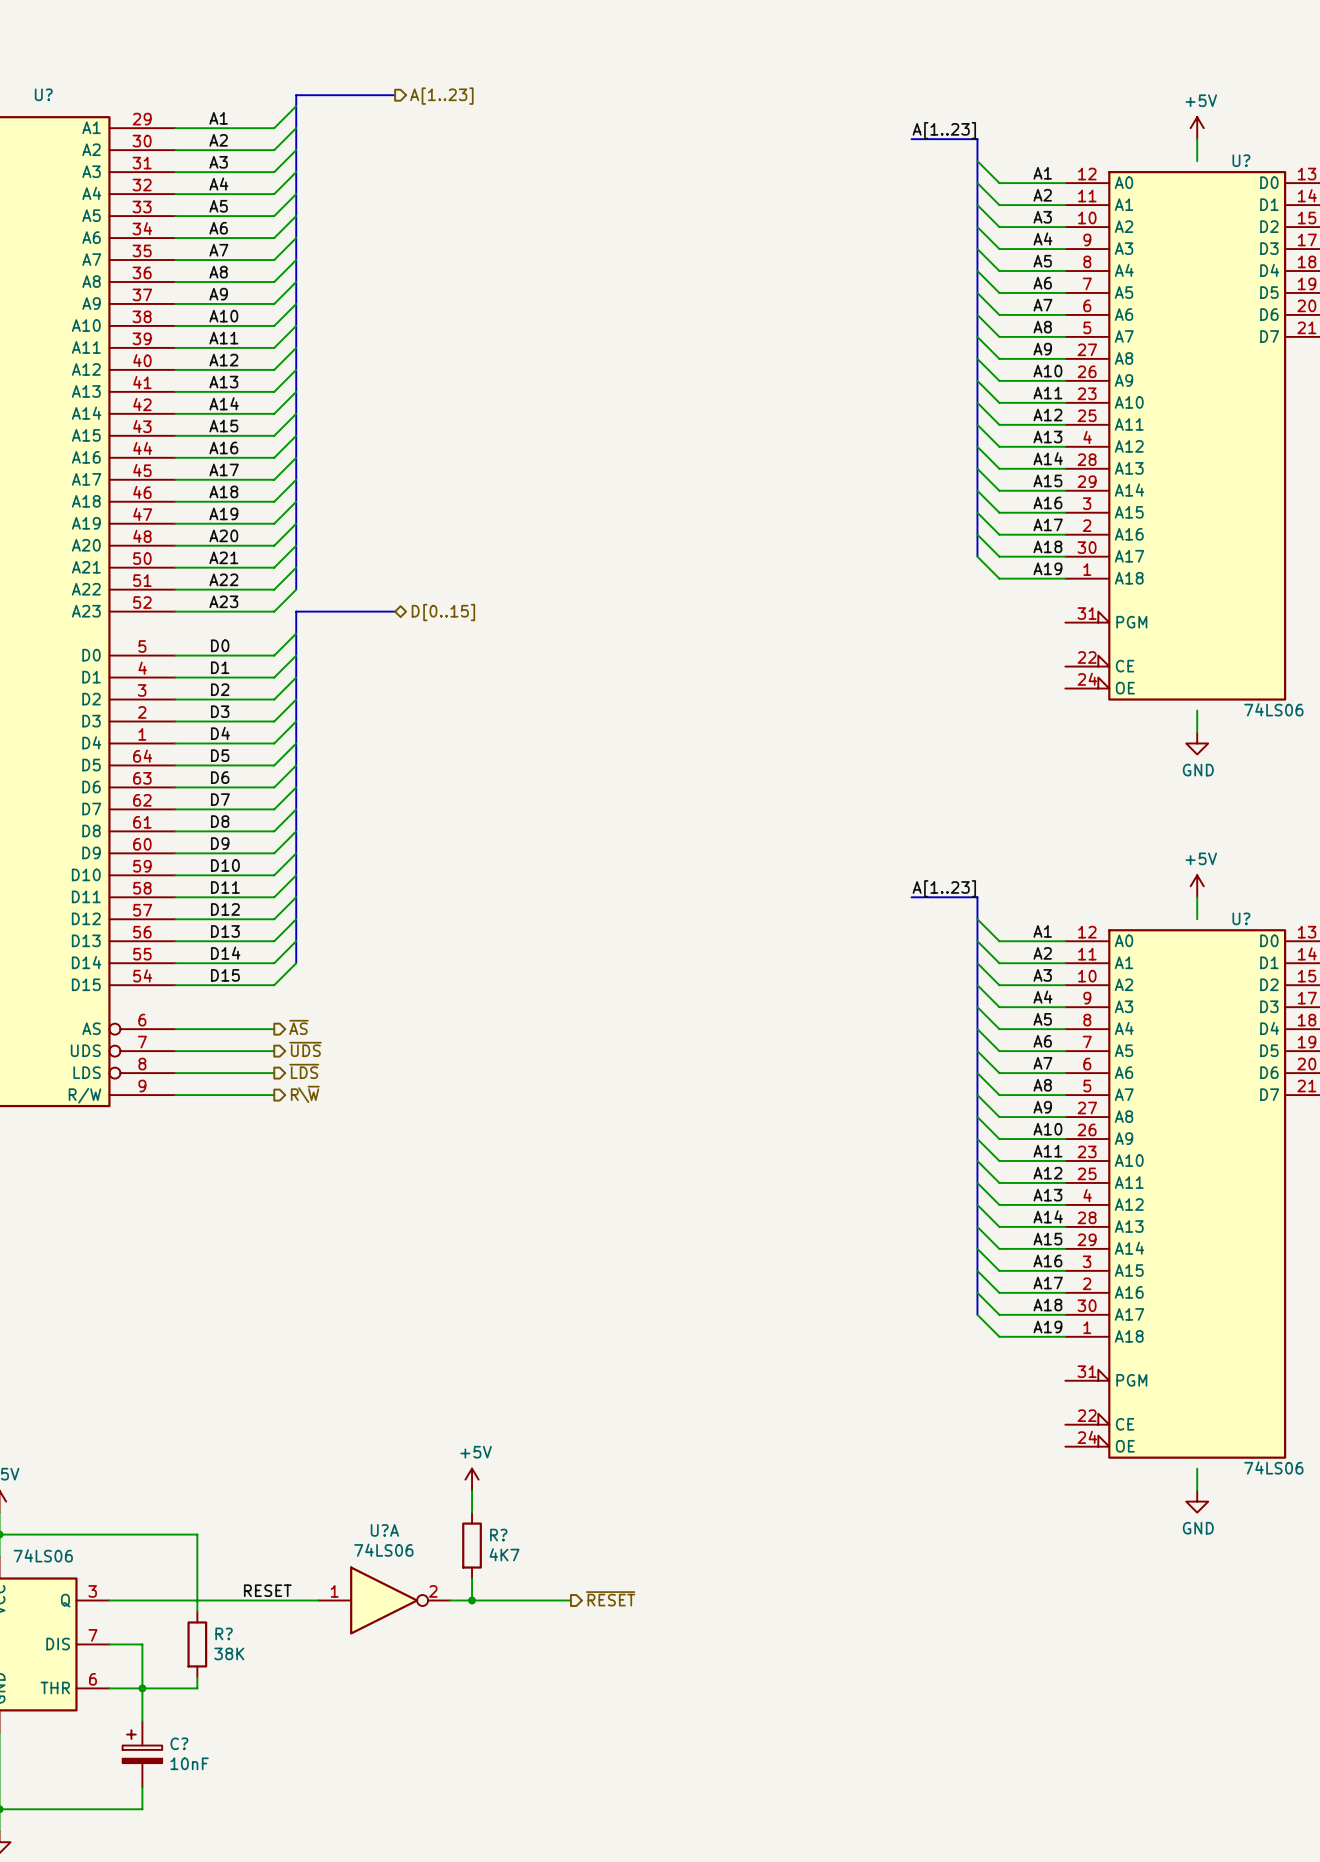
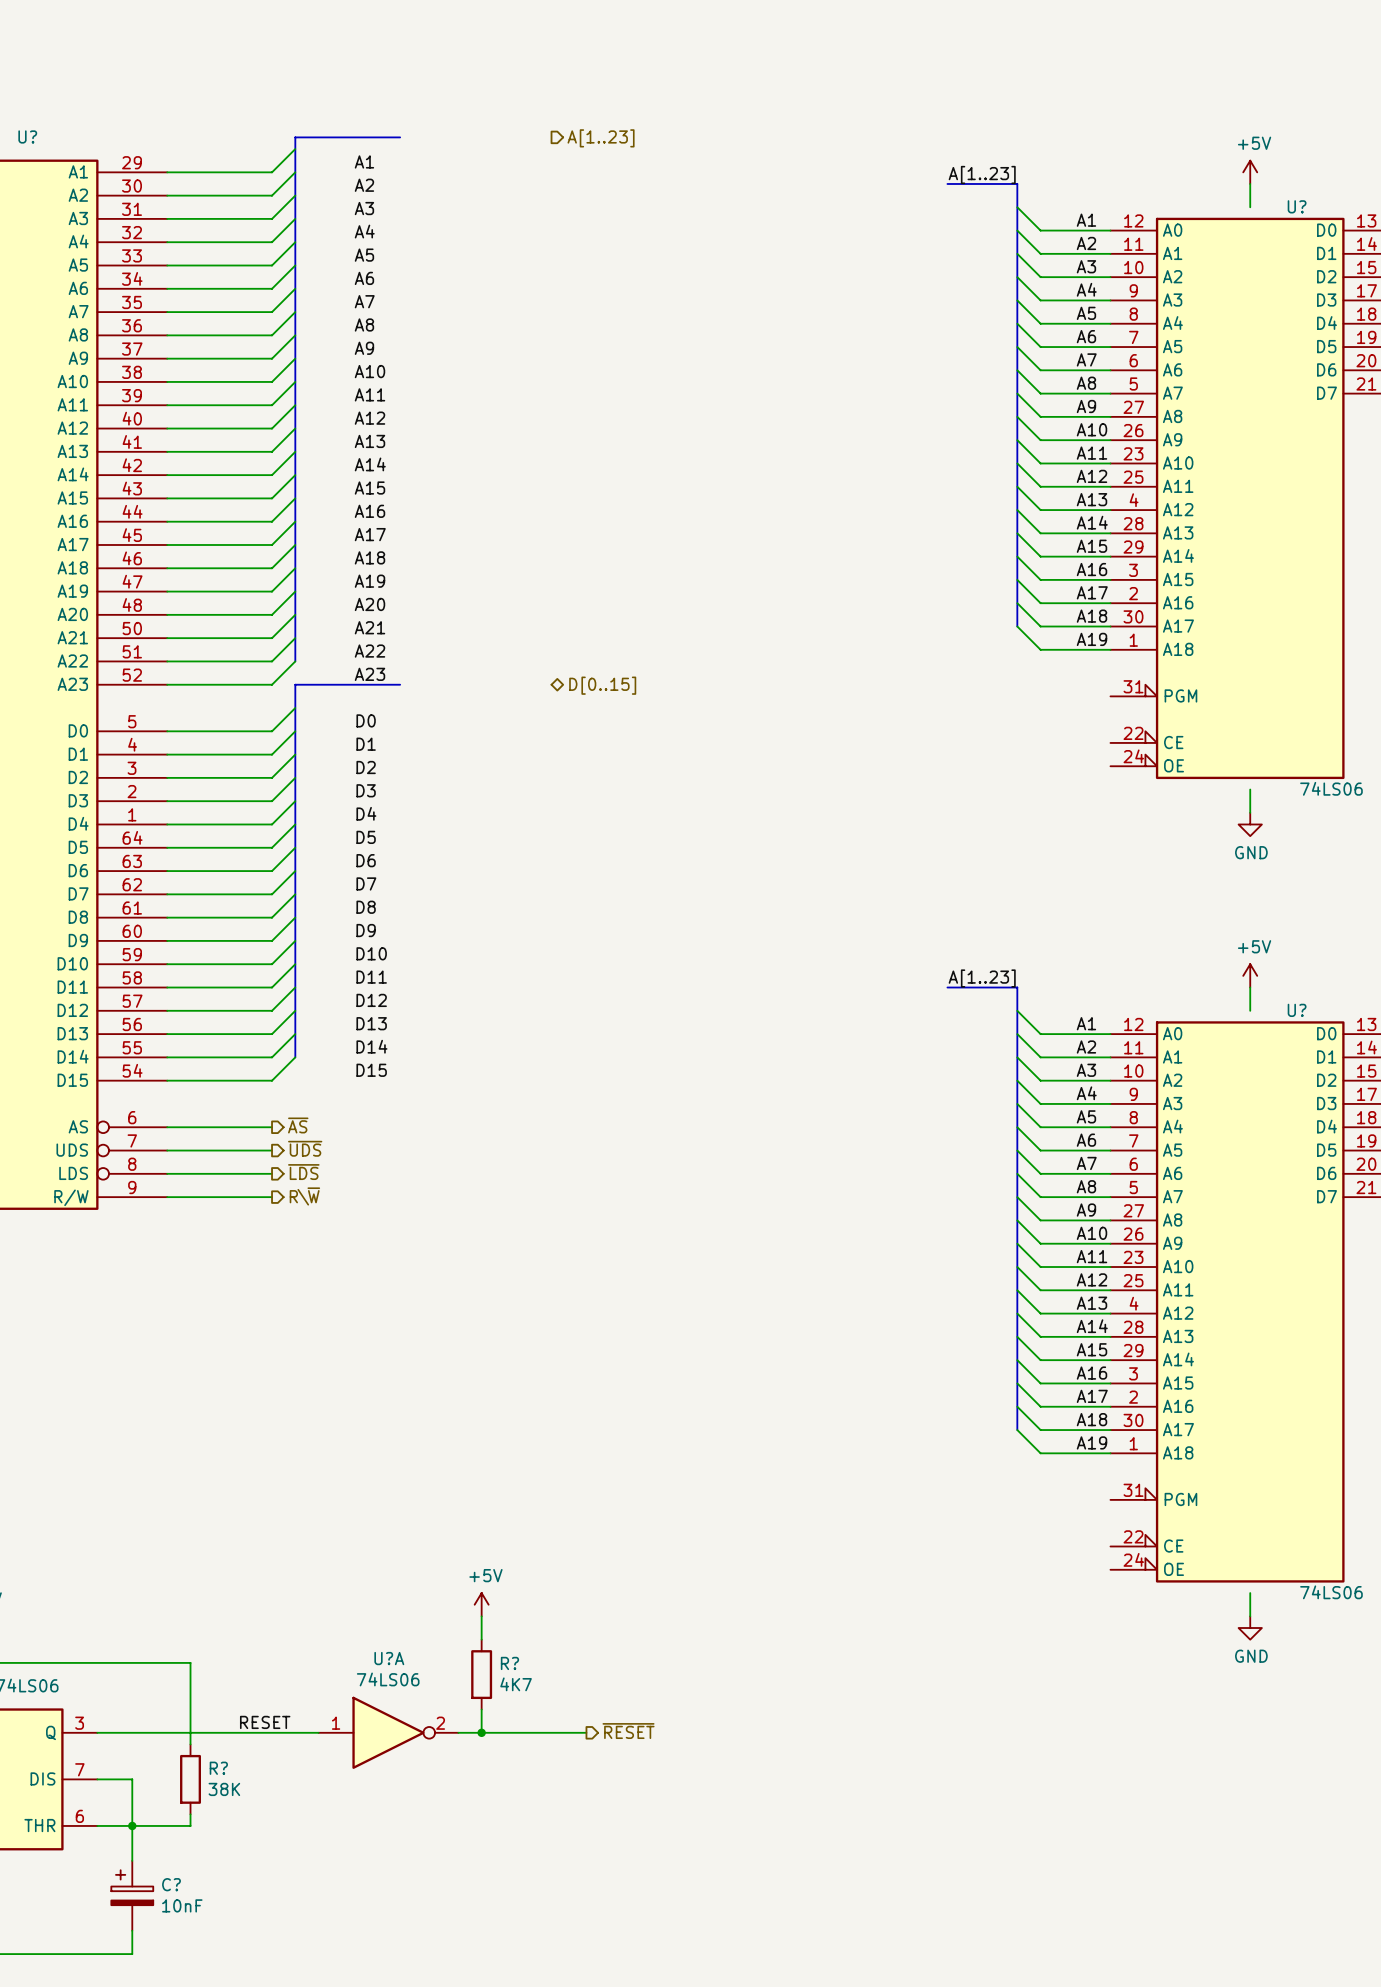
hierarchical label position: A[1..23] (441, 96) -> A[1..23] (601, 138)
label position: A1 (218, 118) -> A1 (364, 161)
label position: A2 (218, 140) -> A2 (364, 185)
label position: A3 (218, 162) -> A3 (364, 208)
label position: A4 (218, 184) -> A4 (364, 231)
label position: A5 (218, 206) -> A5 (364, 255)
label position: A6 (218, 228) -> A6 (364, 278)
label position: A7 (218, 250) -> A7 (364, 301)
label position: A8 (218, 272) -> A8 (364, 324)
label position: A9 (218, 294) -> A9 (364, 348)
label position: A10 (223, 316) -> A10 (369, 371)
label position: A11 (223, 338) -> A11 (369, 394)
label position: A12 (223, 360) -> A12 (369, 418)
label position: A13 (223, 382) -> A13 (369, 441)
label position: A14 (224, 403) -> A14 (370, 464)
label position: A15 (223, 426) -> A15 (369, 488)
label position: A16 (223, 447) -> A16 (369, 511)
label position: A17 (224, 469) -> A17 (370, 534)
label position: A18 (223, 491) -> A18 (369, 557)
label position: A19 (223, 513) -> A19 (369, 581)
label position: A20 (223, 535) -> A20 (369, 604)
label position: A21 (223, 557) -> A21 (369, 627)
label position: A22 (223, 579) -> A22 (369, 651)
label position: A23 (223, 601) -> A23 (369, 674)
hierarchical label position: D[0..15] (443, 612) -> D[0..15] (602, 685)
label position: D0 (220, 645) -> D0 (366, 720)
label position: D1 (220, 667) -> D1 (366, 744)
label position: D2 (220, 689) -> D2 (366, 767)
label position: D3 (220, 711) -> D3 (366, 790)
label position: D4 (220, 733) -> D4 (366, 813)
label position: D5 (220, 755) -> D5 (366, 837)
label position: D6 (220, 777) -> D6 (366, 860)
label position: D7 (220, 799) -> D7 (366, 883)
label position: D8 (220, 821) -> D8 (366, 907)
label position: D9 (220, 843) -> D9 (366, 930)
label position: D10 (225, 865) -> D10 (371, 953)
label position: D11 (225, 887) -> D11 (371, 977)
label position: D12 (225, 909) -> D12 (371, 1000)
label position: D13 (225, 931) -> D13 (371, 1023)
label position: D14 (225, 953) -> D14 (371, 1046)
label position: D15 (225, 975) -> D15 (371, 1070)

